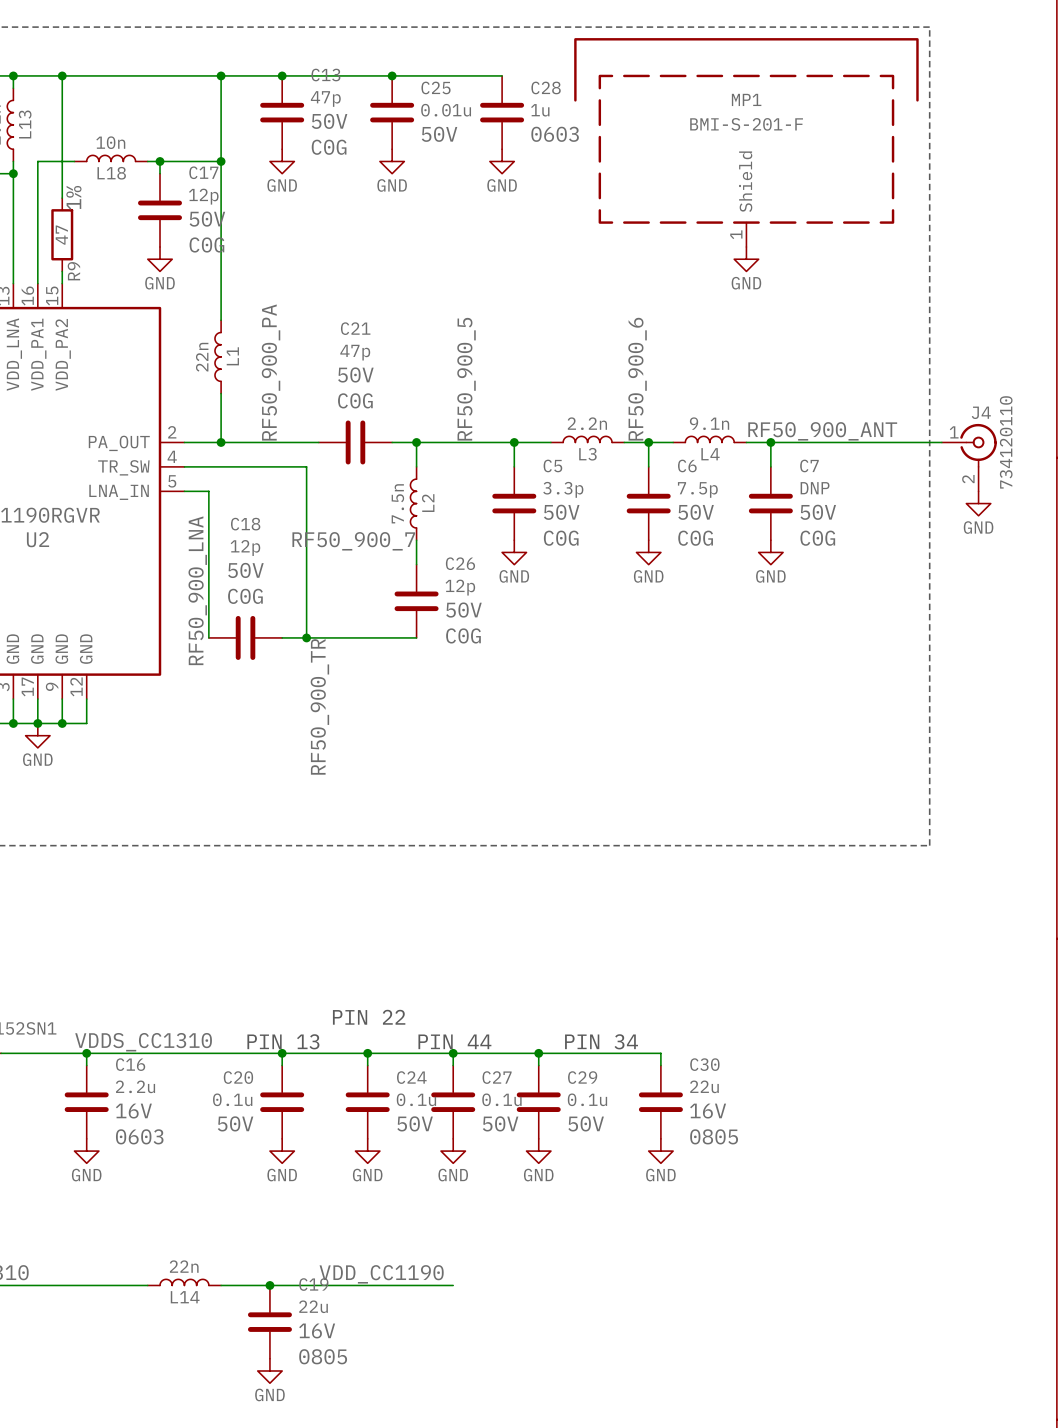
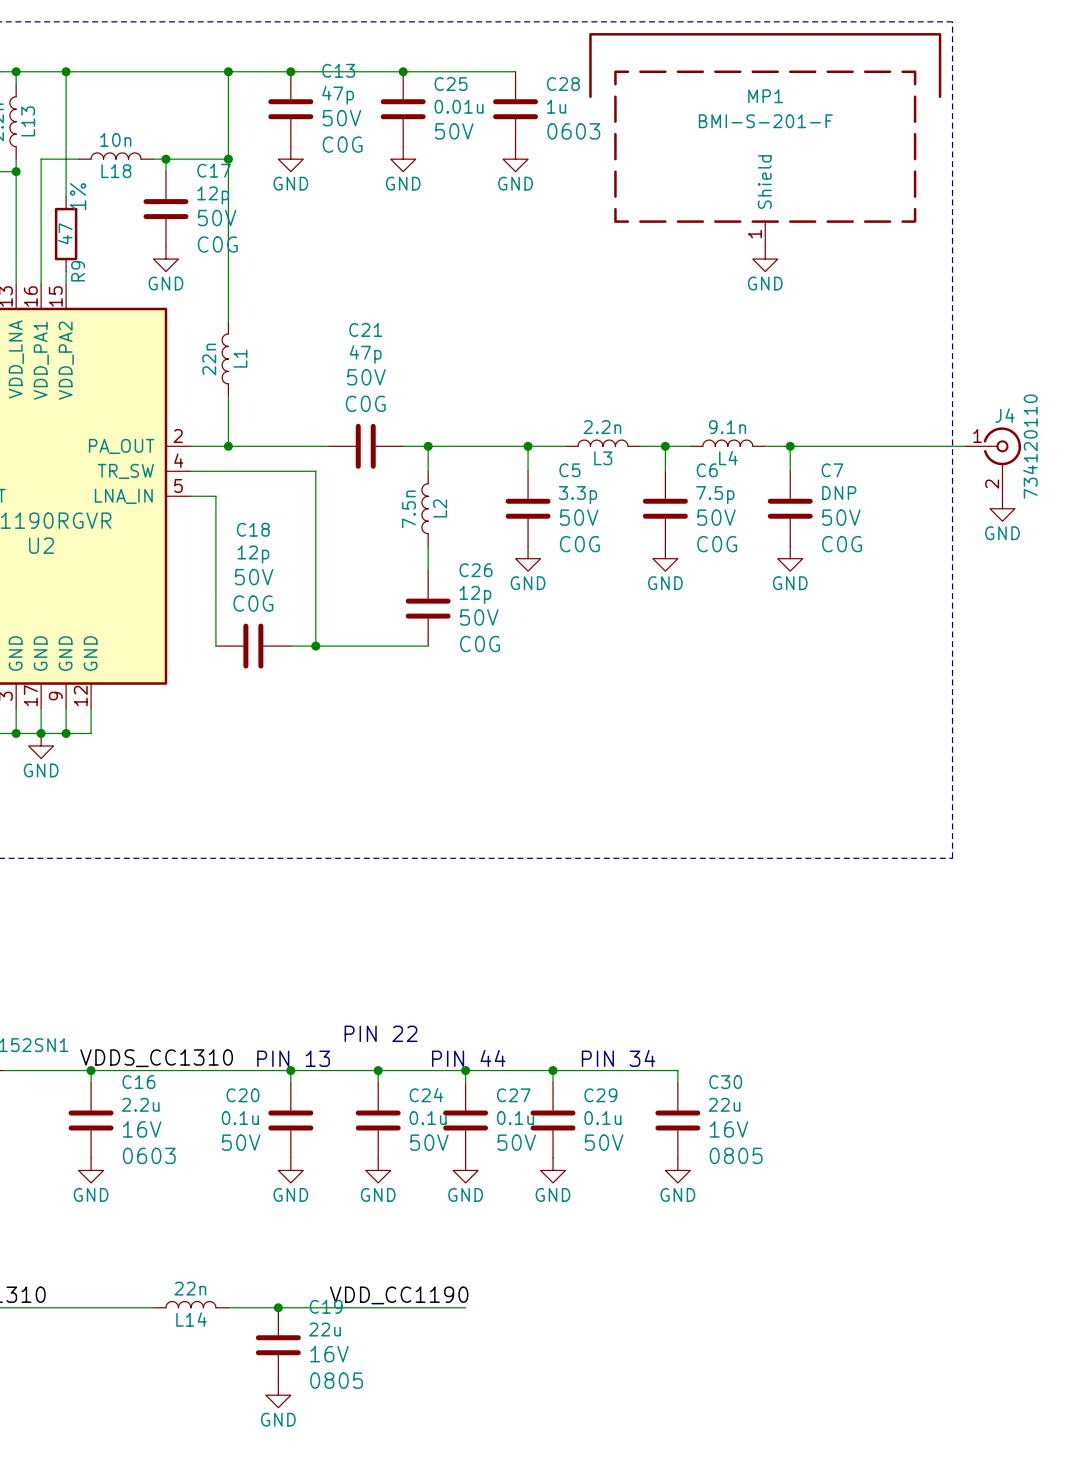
label: RF50_900_PA (271, 372) -> none
label: RF50_900_5 (466, 379) -> none
label: RF50_900_6 (637, 379) -> none
label: RF50_900_ANT (822, 431) -> none
label: RF50_900_7 (353, 541) -> none
label: RF50_900_LNA (197, 590) -> none
label: RF50_900_TR (319, 706) -> none

